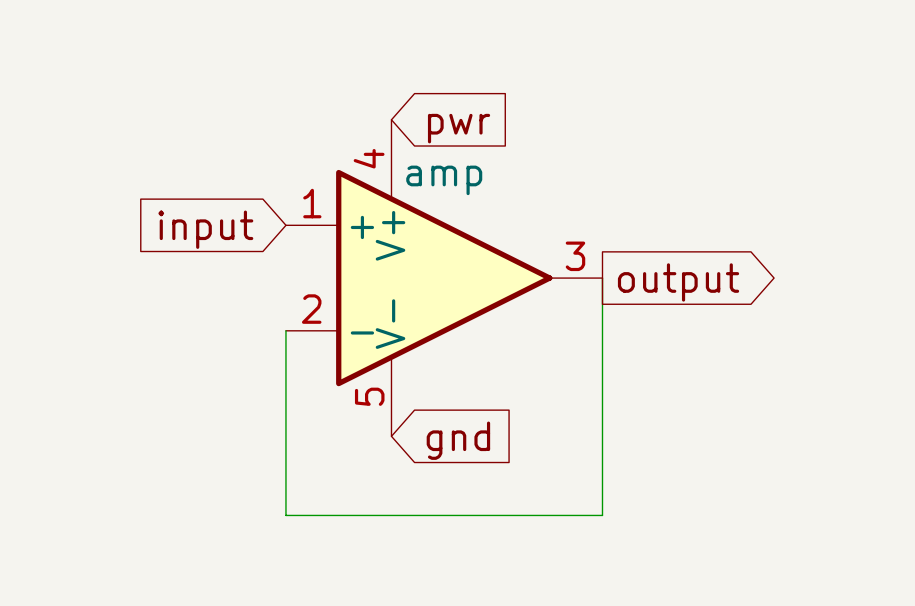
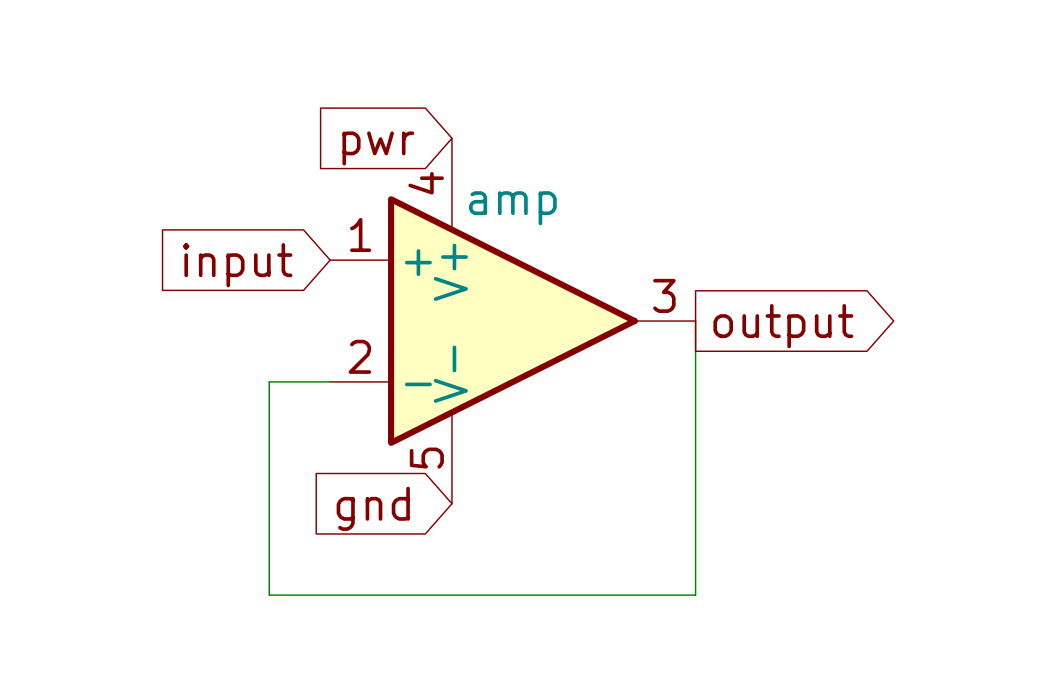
global label rotation: 0° (459, 128) -> 180° (378, 148)
global label position: pwr (459, 128) -> pwr (378, 148)
wire: (285, 330) (285, 515) -> (330, 381) (269, 381) (269, 595) (330, 595)
global label rotation: 0° (458, 440) -> 180° (373, 508)

